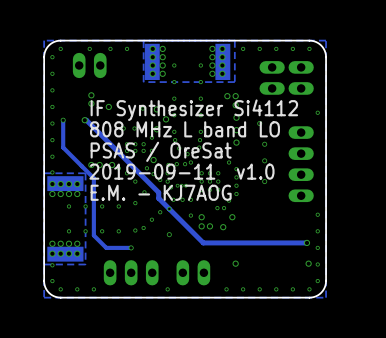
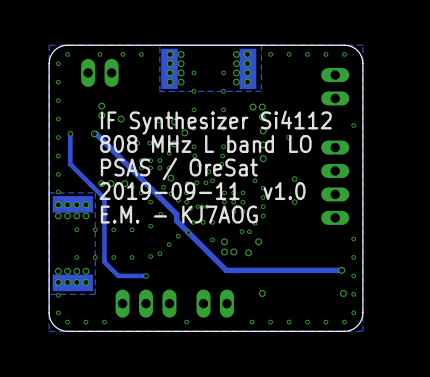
part: (272, 77) -> none
via: (264, 144) -> none
via: (169, 234) -> none

